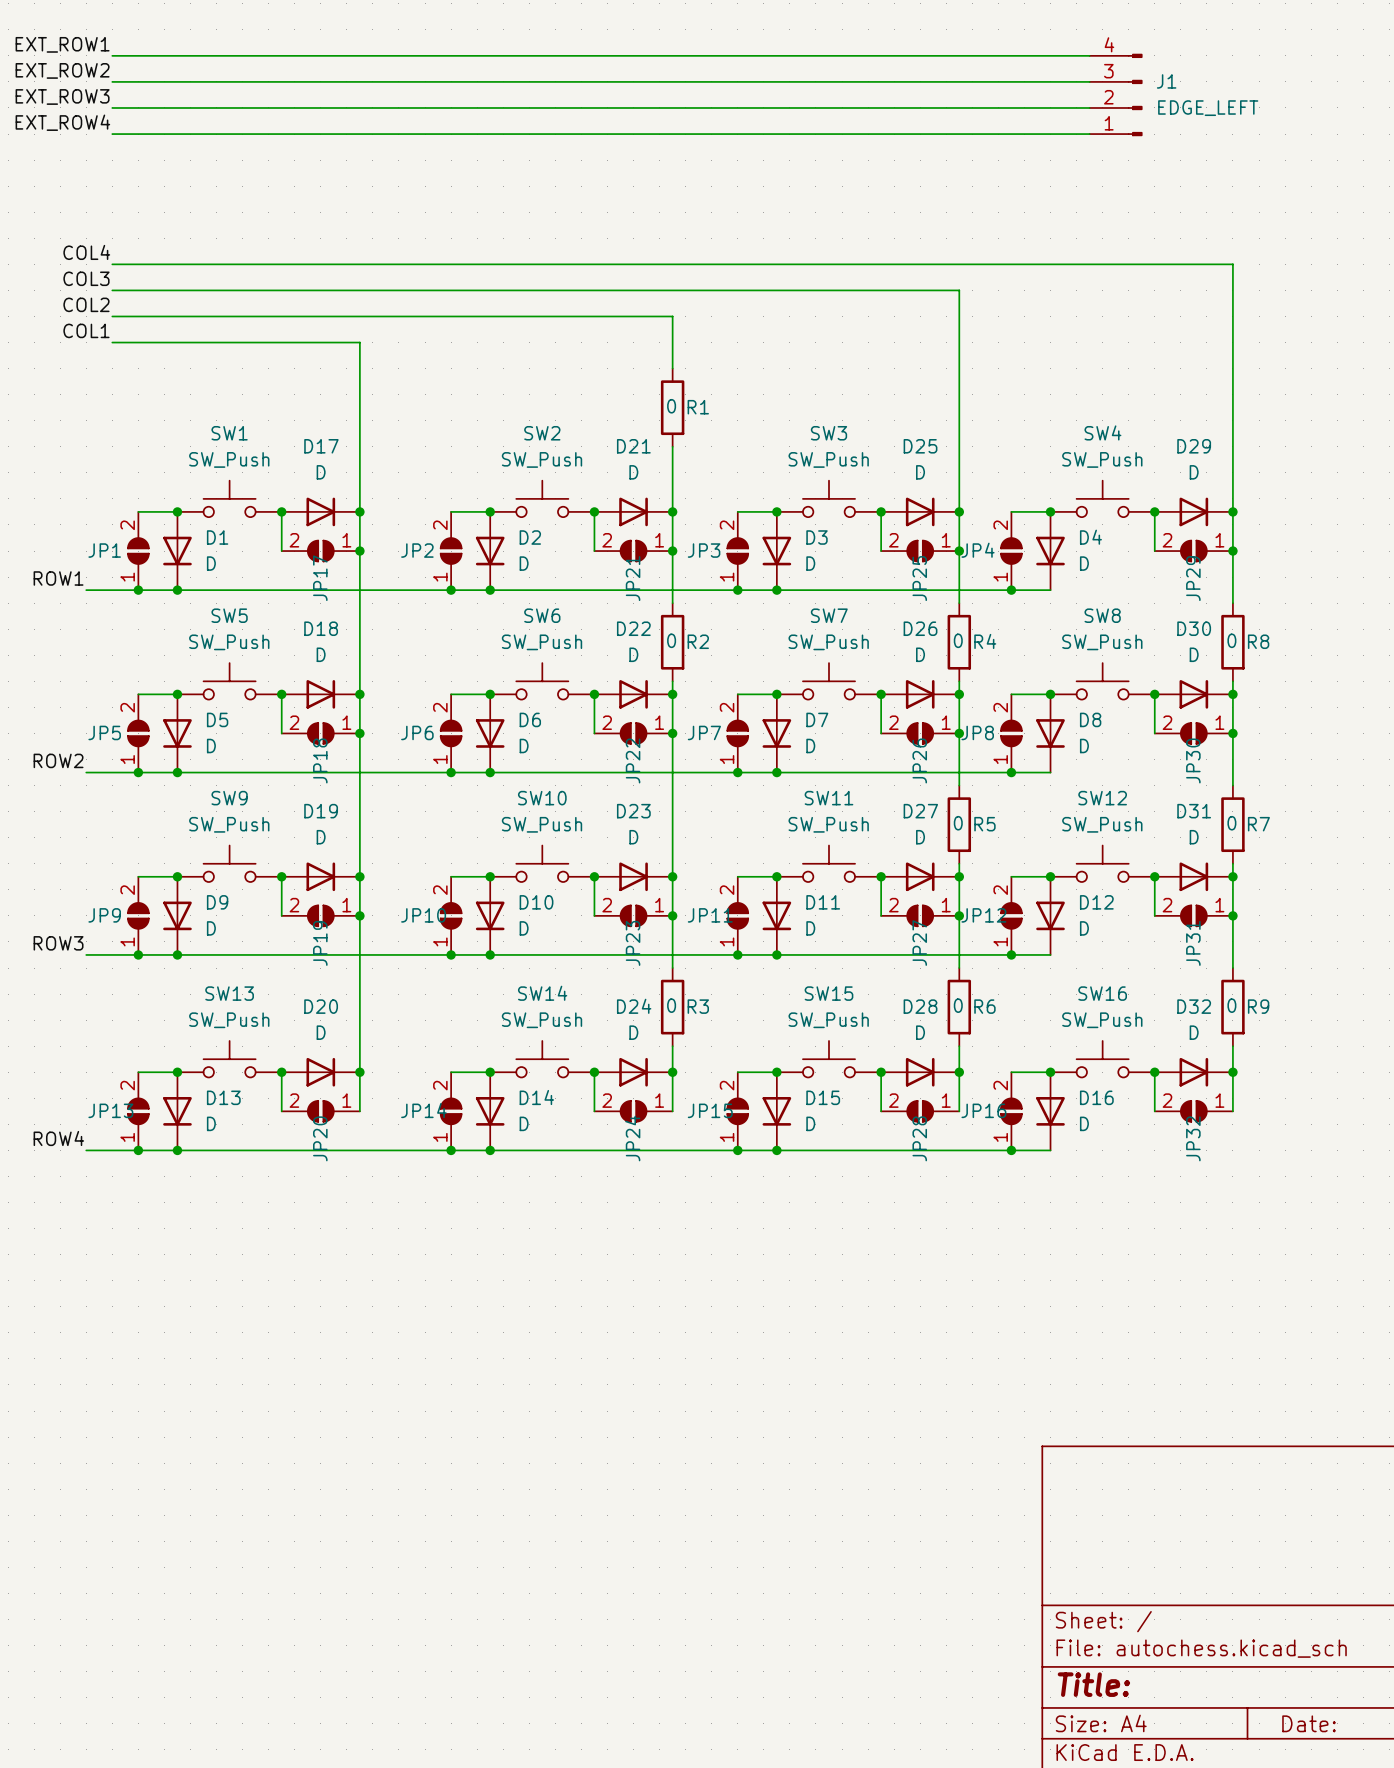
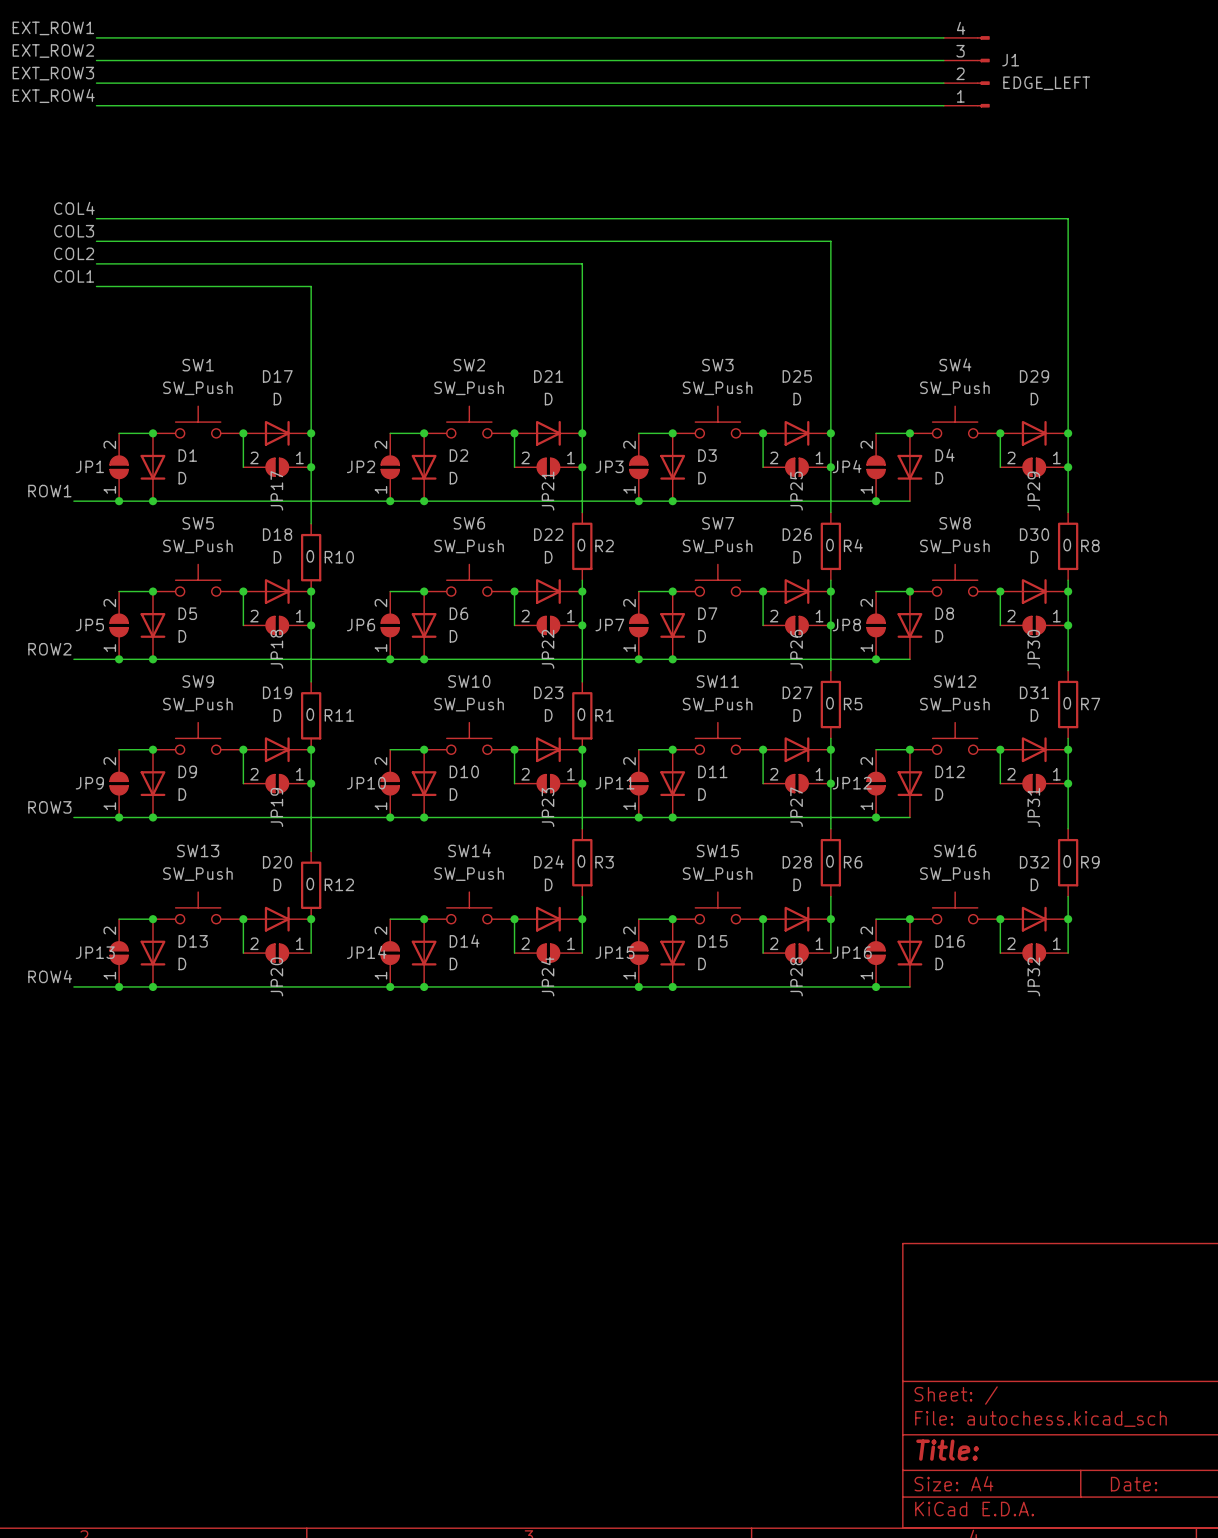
wire: none -> (582, 309) (582, 376)
R1 position: (672, 407) -> (582, 715)
wire: (359, 616) (359, 694) -> none
R10: none -> 0 (311, 557)
wire: (359, 798) (359, 876) -> none
wire: (672, 798) (672, 876) -> none
R11: none -> 0 (311, 715)
wire: (359, 994) (359, 1072) -> none
R12: none -> 0 (311, 885)

